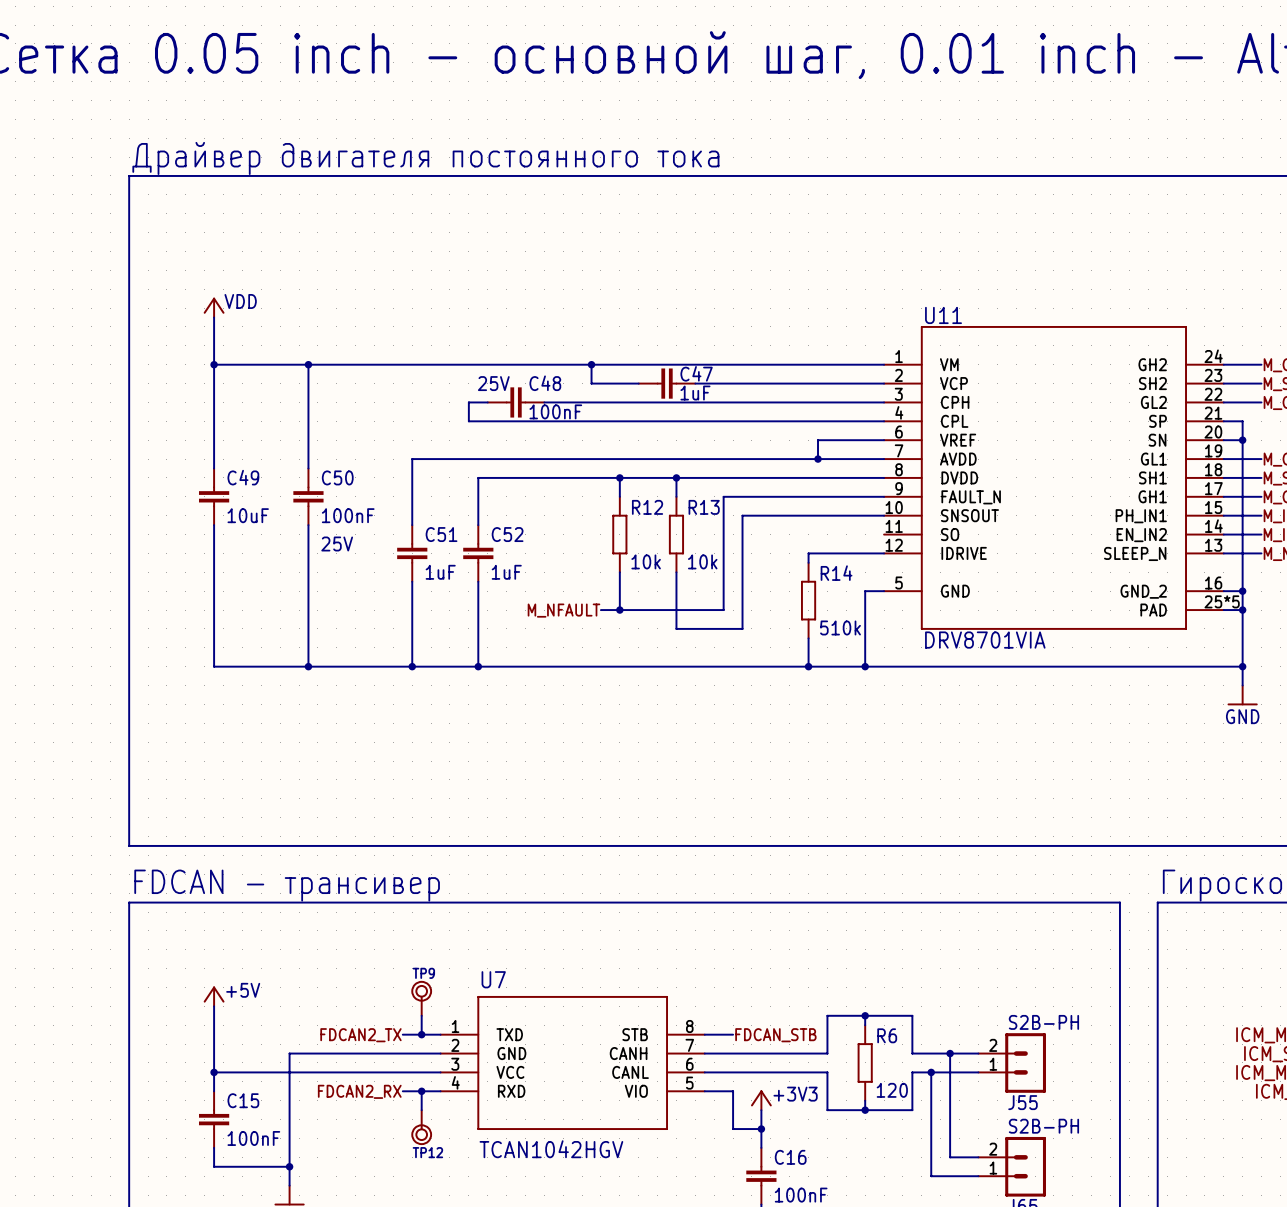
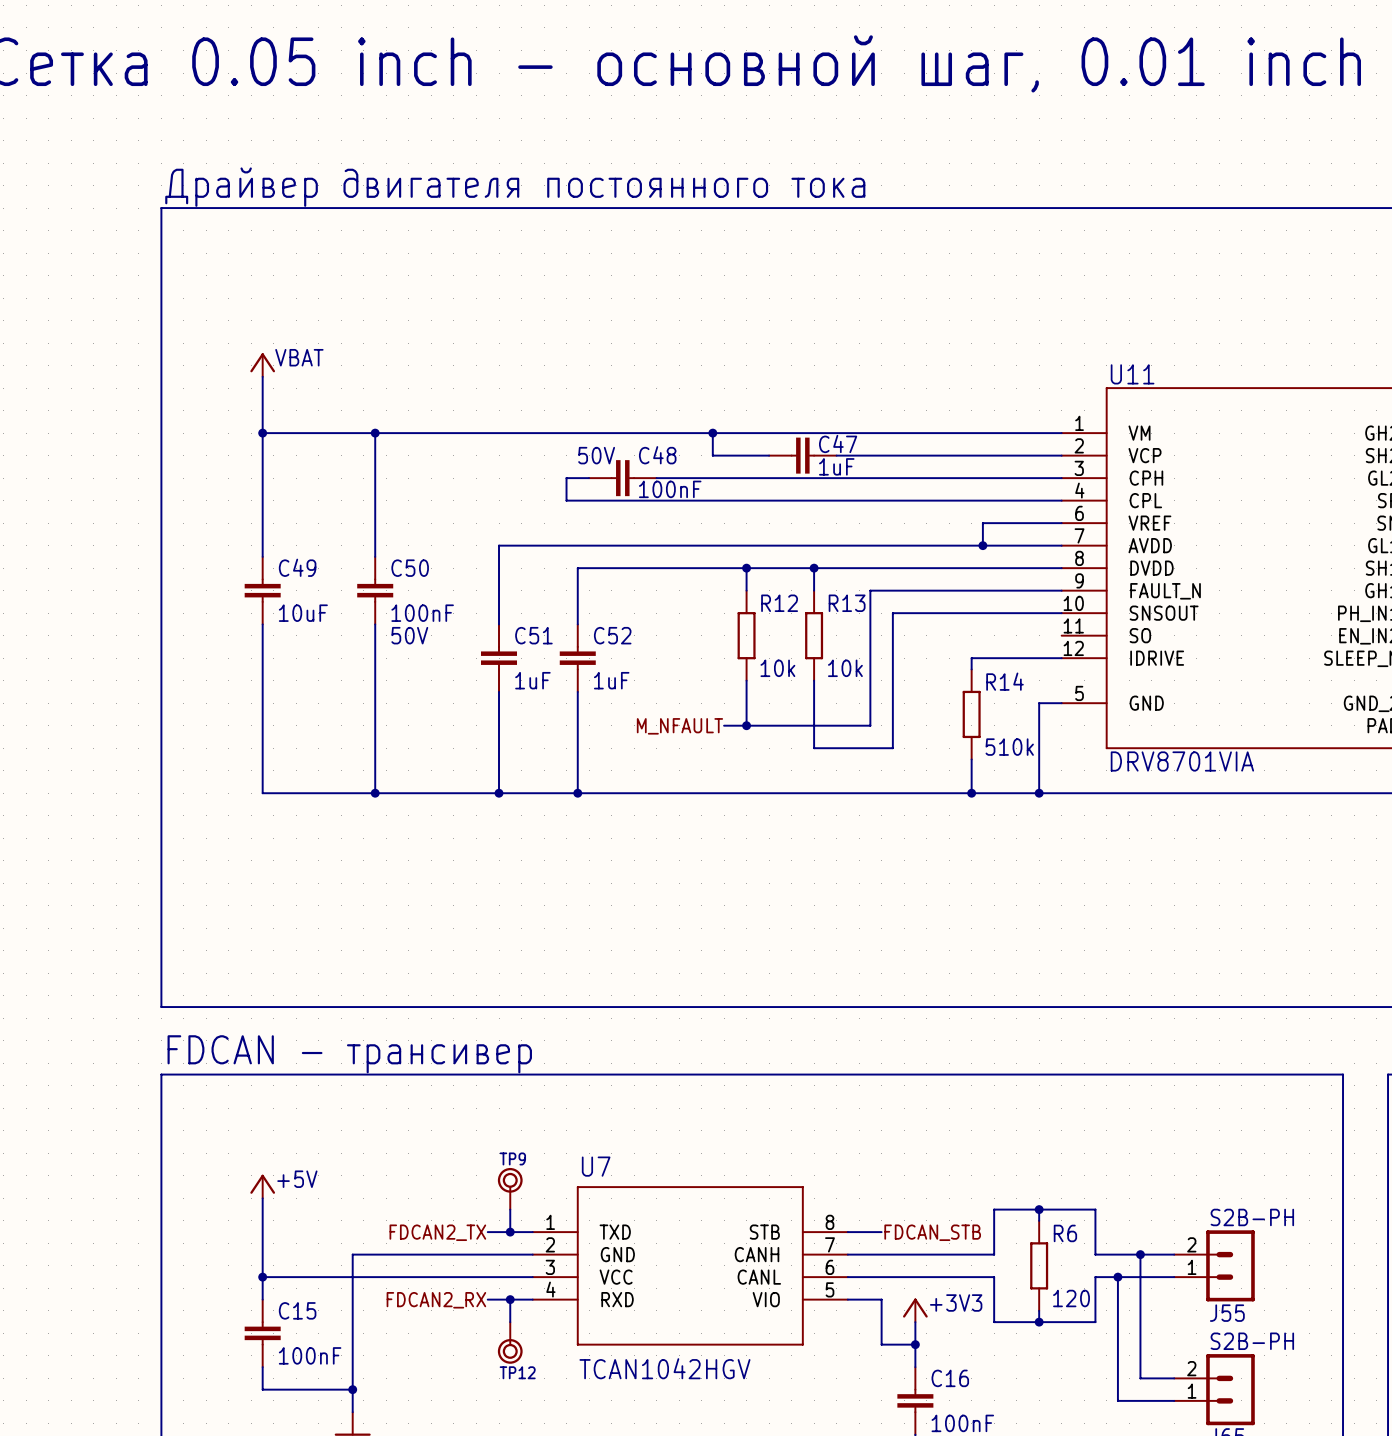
power symbol: VDD (214, 307) -> VBAT (262, 365)
text: 25V (493, 383) -> 50V (596, 455)
text: 25V (337, 543) -> 50V (409, 635)

